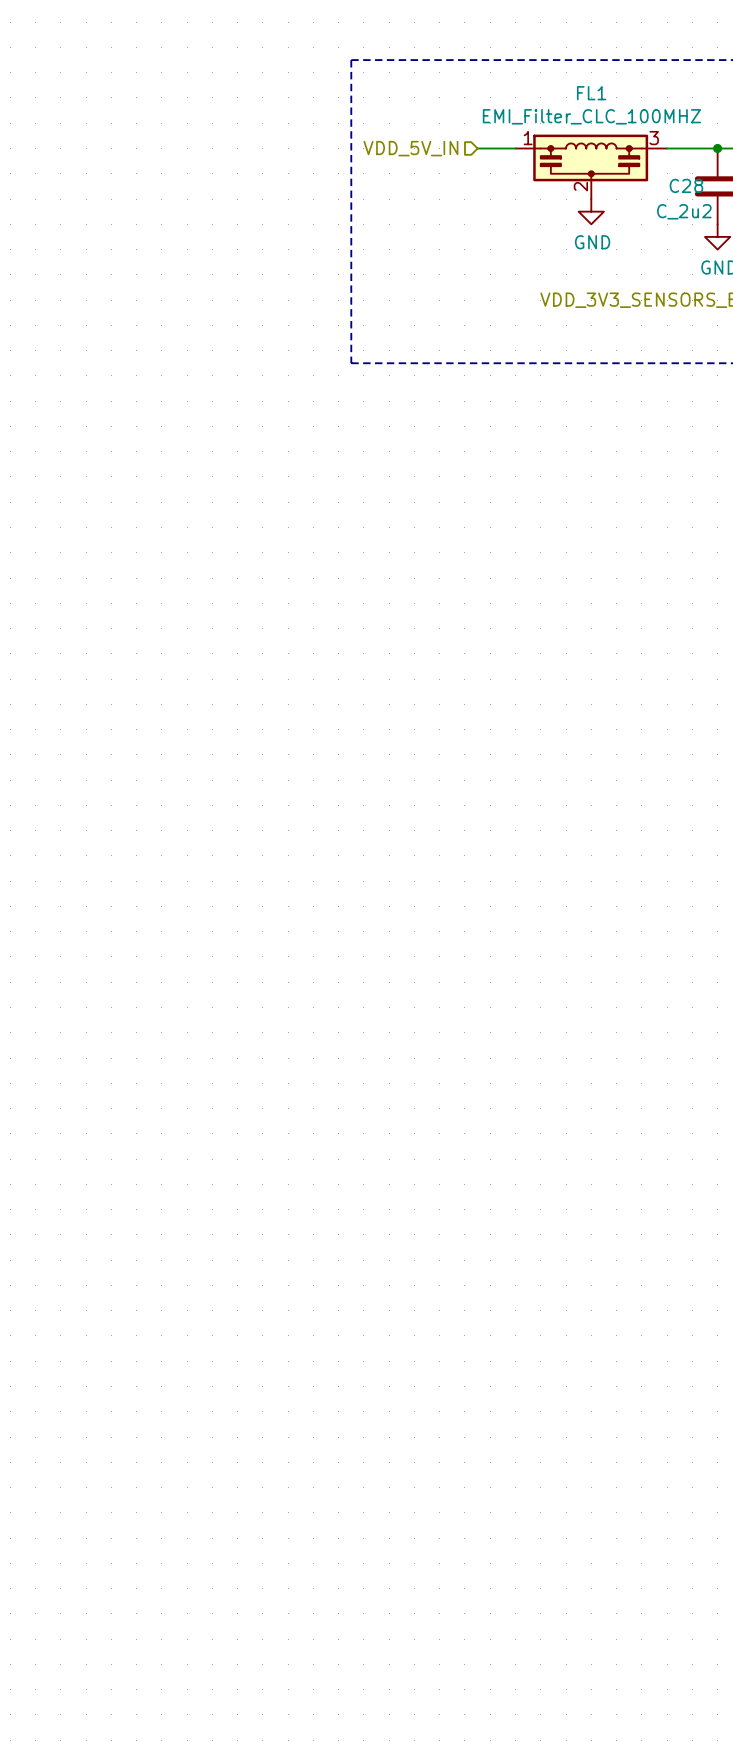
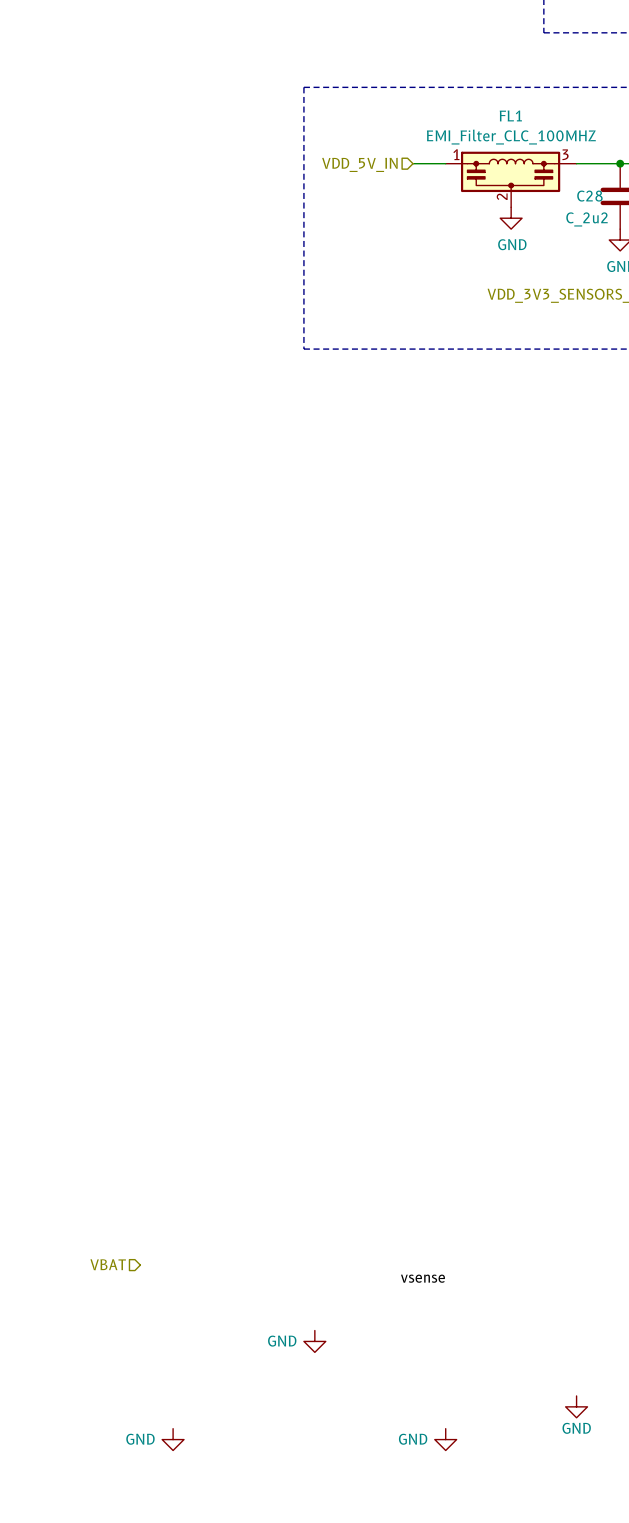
hierarchical label: none -> VBAT (108, 1264)
label: none -> vsense (422, 1278)
power symbol: none -> GND (314, 1341)
power symbol: none -> GND (576, 1406)
power symbol: none -> GND (173, 1439)
power symbol: none -> GND (445, 1439)

